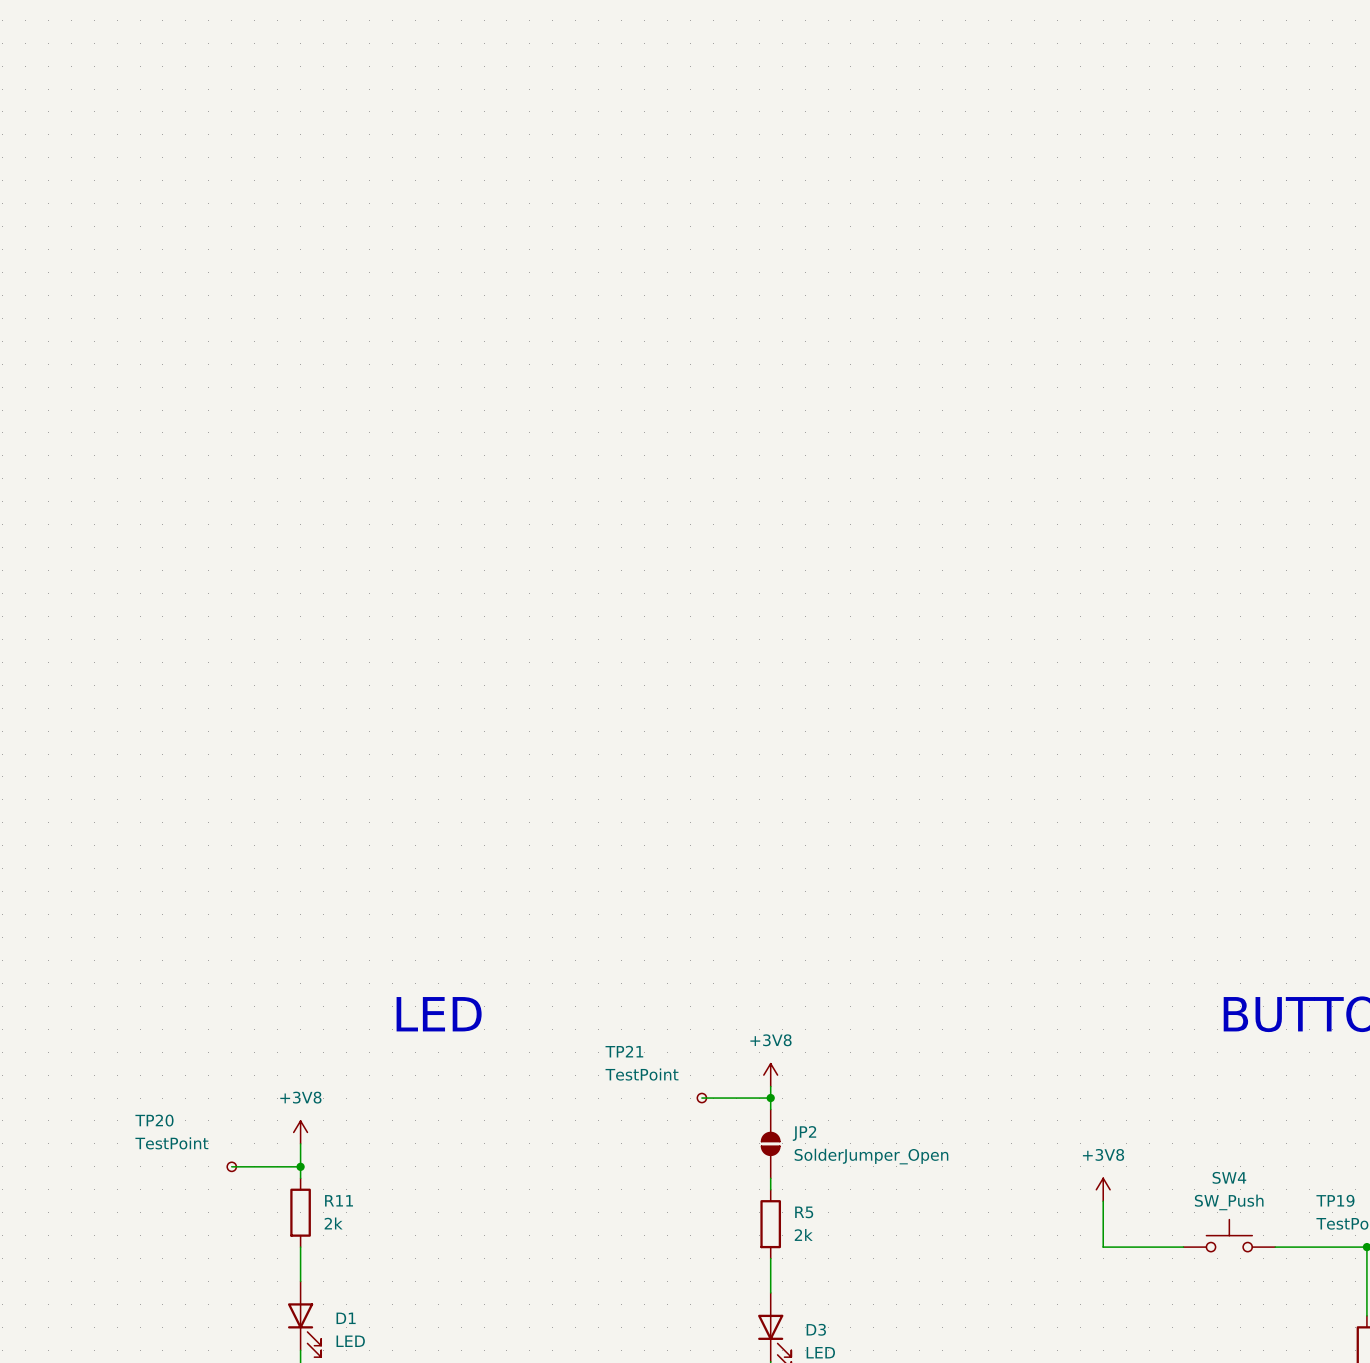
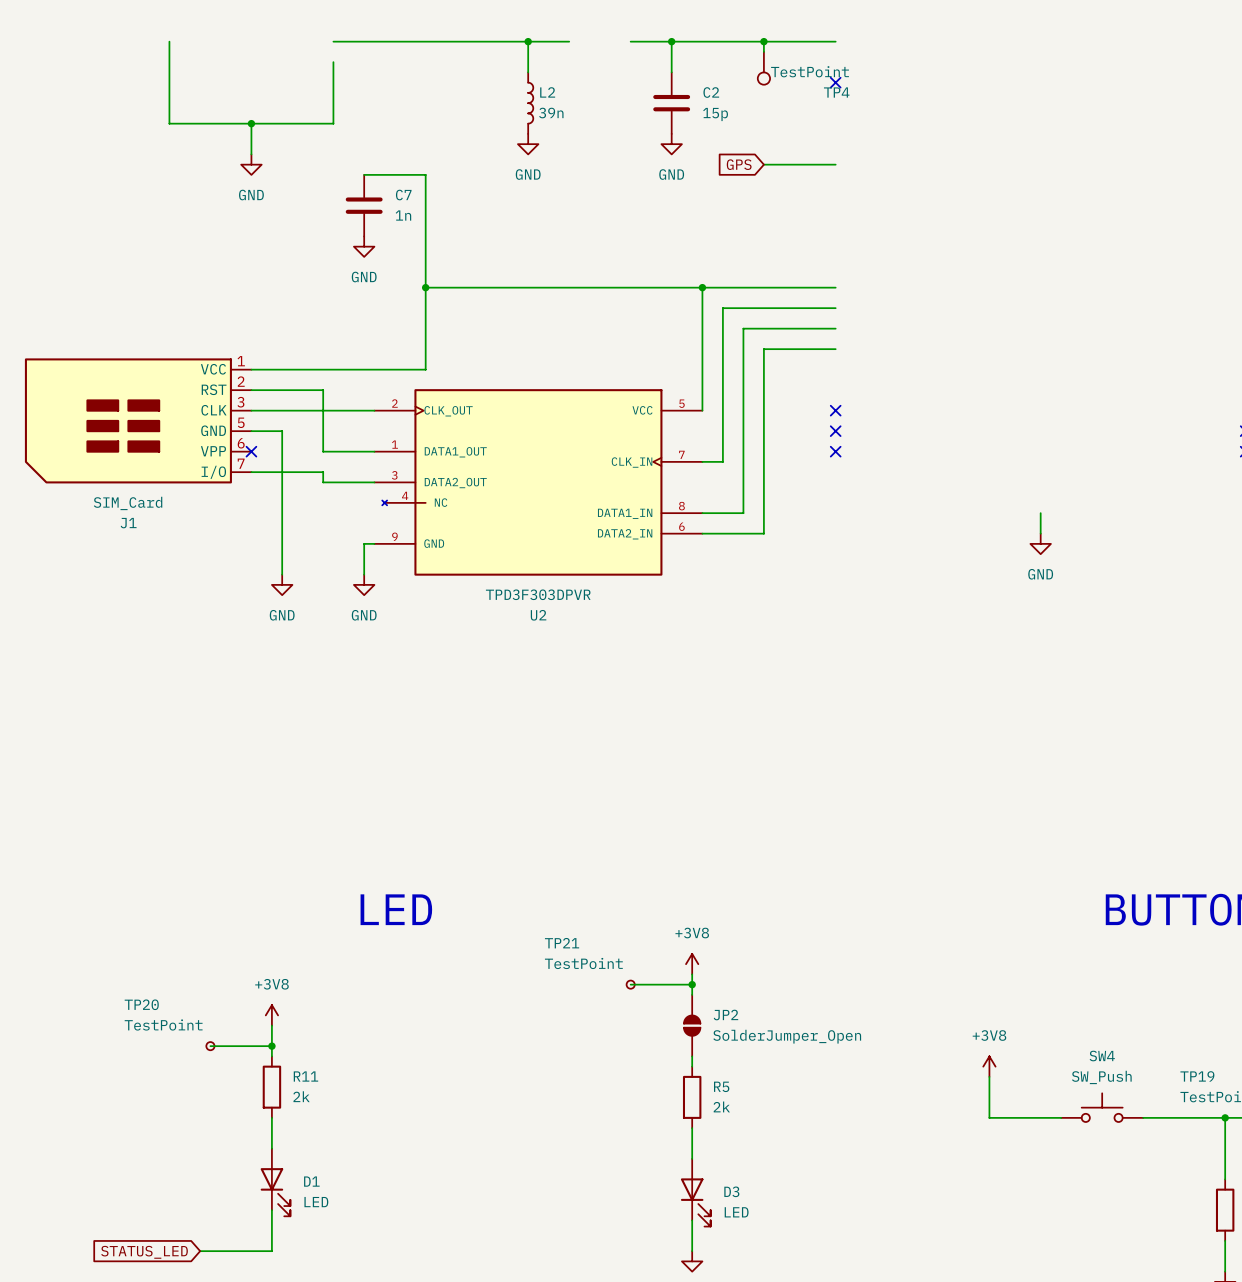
wire: none -> (169, 41) (169, 123) (333, 123) (333, 62)
wire: none -> (333, 41) (569, 41)
wire: none -> (528, 41) (528, 72)
junction: none -> (528, 41)
wire: none -> (630, 41) (835, 41)
wire: none -> (671, 41) (671, 72)
junction: none -> (671, 41)
wire: none -> (763, 41) (763, 51)
junction: none -> (763, 41)
TP4: none -> TestPoint (763, 68)
no-connect mark: none -> (835, 82)
L2: none -> 39n (530, 103)
C2: none -> 15p (671, 103)
wire: none -> (251, 123) (251, 154)
junction: none -> (251, 123)
power symbol: none -> GND (528, 144)
power symbol: none -> GND (671, 144)
power symbol: none -> GND (251, 164)
global label: none -> GPS (739, 164)
wire: none -> (763, 164) (835, 164)
wire: none -> (364, 174) (425, 174) (425, 369) (251, 369)
C7: none -> 1n (364, 205)
power symbol: none -> GND (364, 246)
wire: none -> (425, 287) (835, 287)
junction: none -> (425, 287)
wire: none -> (702, 287) (702, 410)
junction: none -> (702, 287)
wire: none -> (835, 308) (722, 308) (722, 461) (702, 461)
wire: none -> (835, 328) (743, 328) (743, 513) (702, 513)
wire: none -> (835, 349) (763, 349) (763, 533) (702, 533)
wire: none -> (251, 390) (323, 390) (323, 451) (374, 451)
wire: none -> (251, 410) (374, 410)
no-connect mark: none -> (835, 410)
J1: none -> SIM_Card (138, 420)
wire: none -> (251, 431) (282, 431) (282, 574)
no-connect mark: none -> (835, 431)
no-connect mark: none -> (251, 451)
no-connect mark: none -> (835, 451)
wire: none -> (251, 472) (323, 472) (323, 482) (374, 482)
U2: none -> TPD3F303DPVR (538, 482)
wire: none -> (1040, 513) (1040, 533)
wire: none -> (374, 543) (364, 543) (364, 574)
power symbol: none -> GND (1040, 543)
power symbol: none -> GND (282, 584)
power symbol: none -> GND (364, 584)

